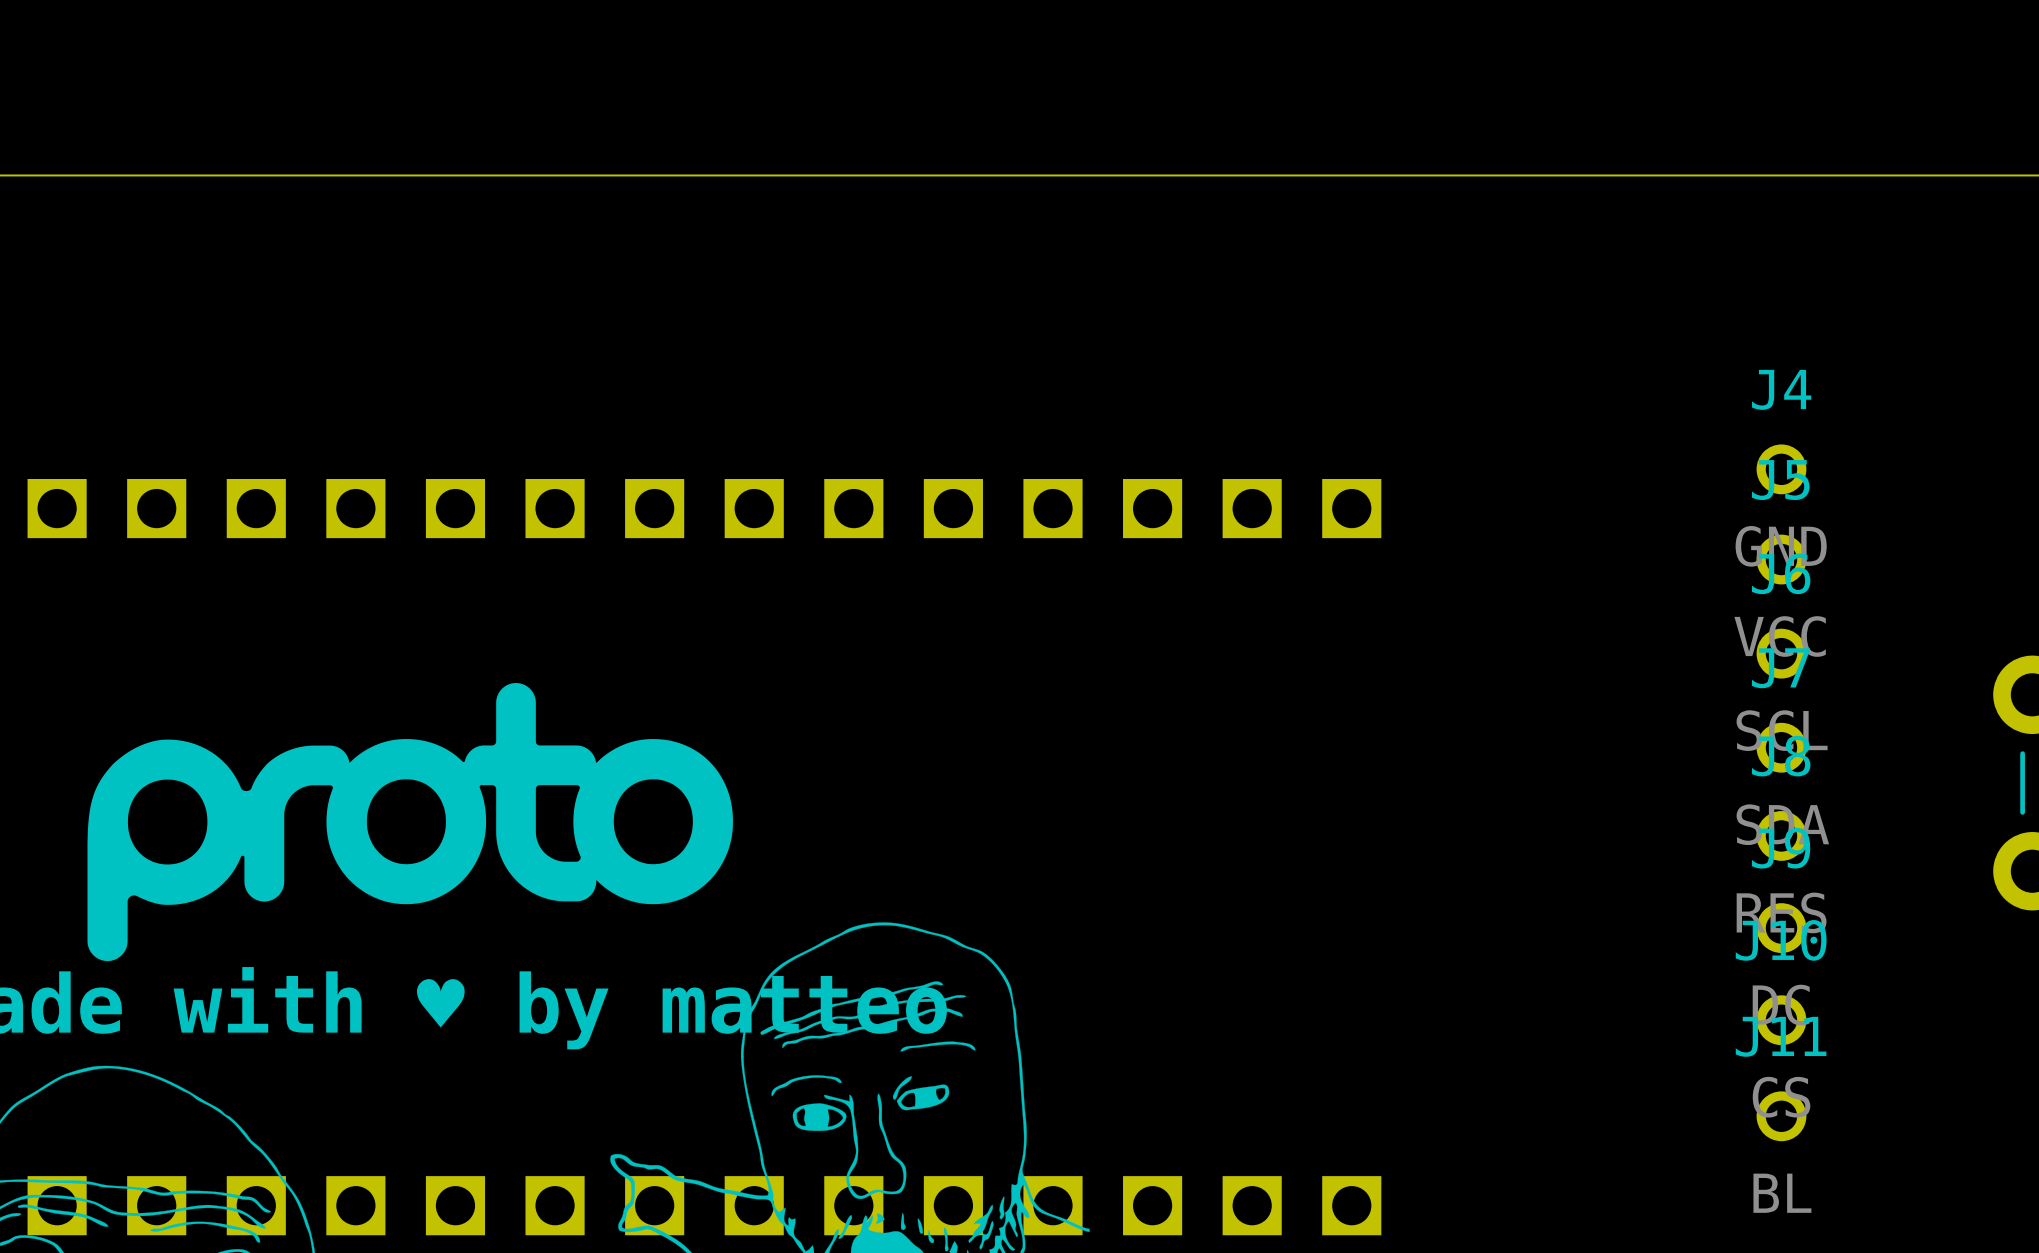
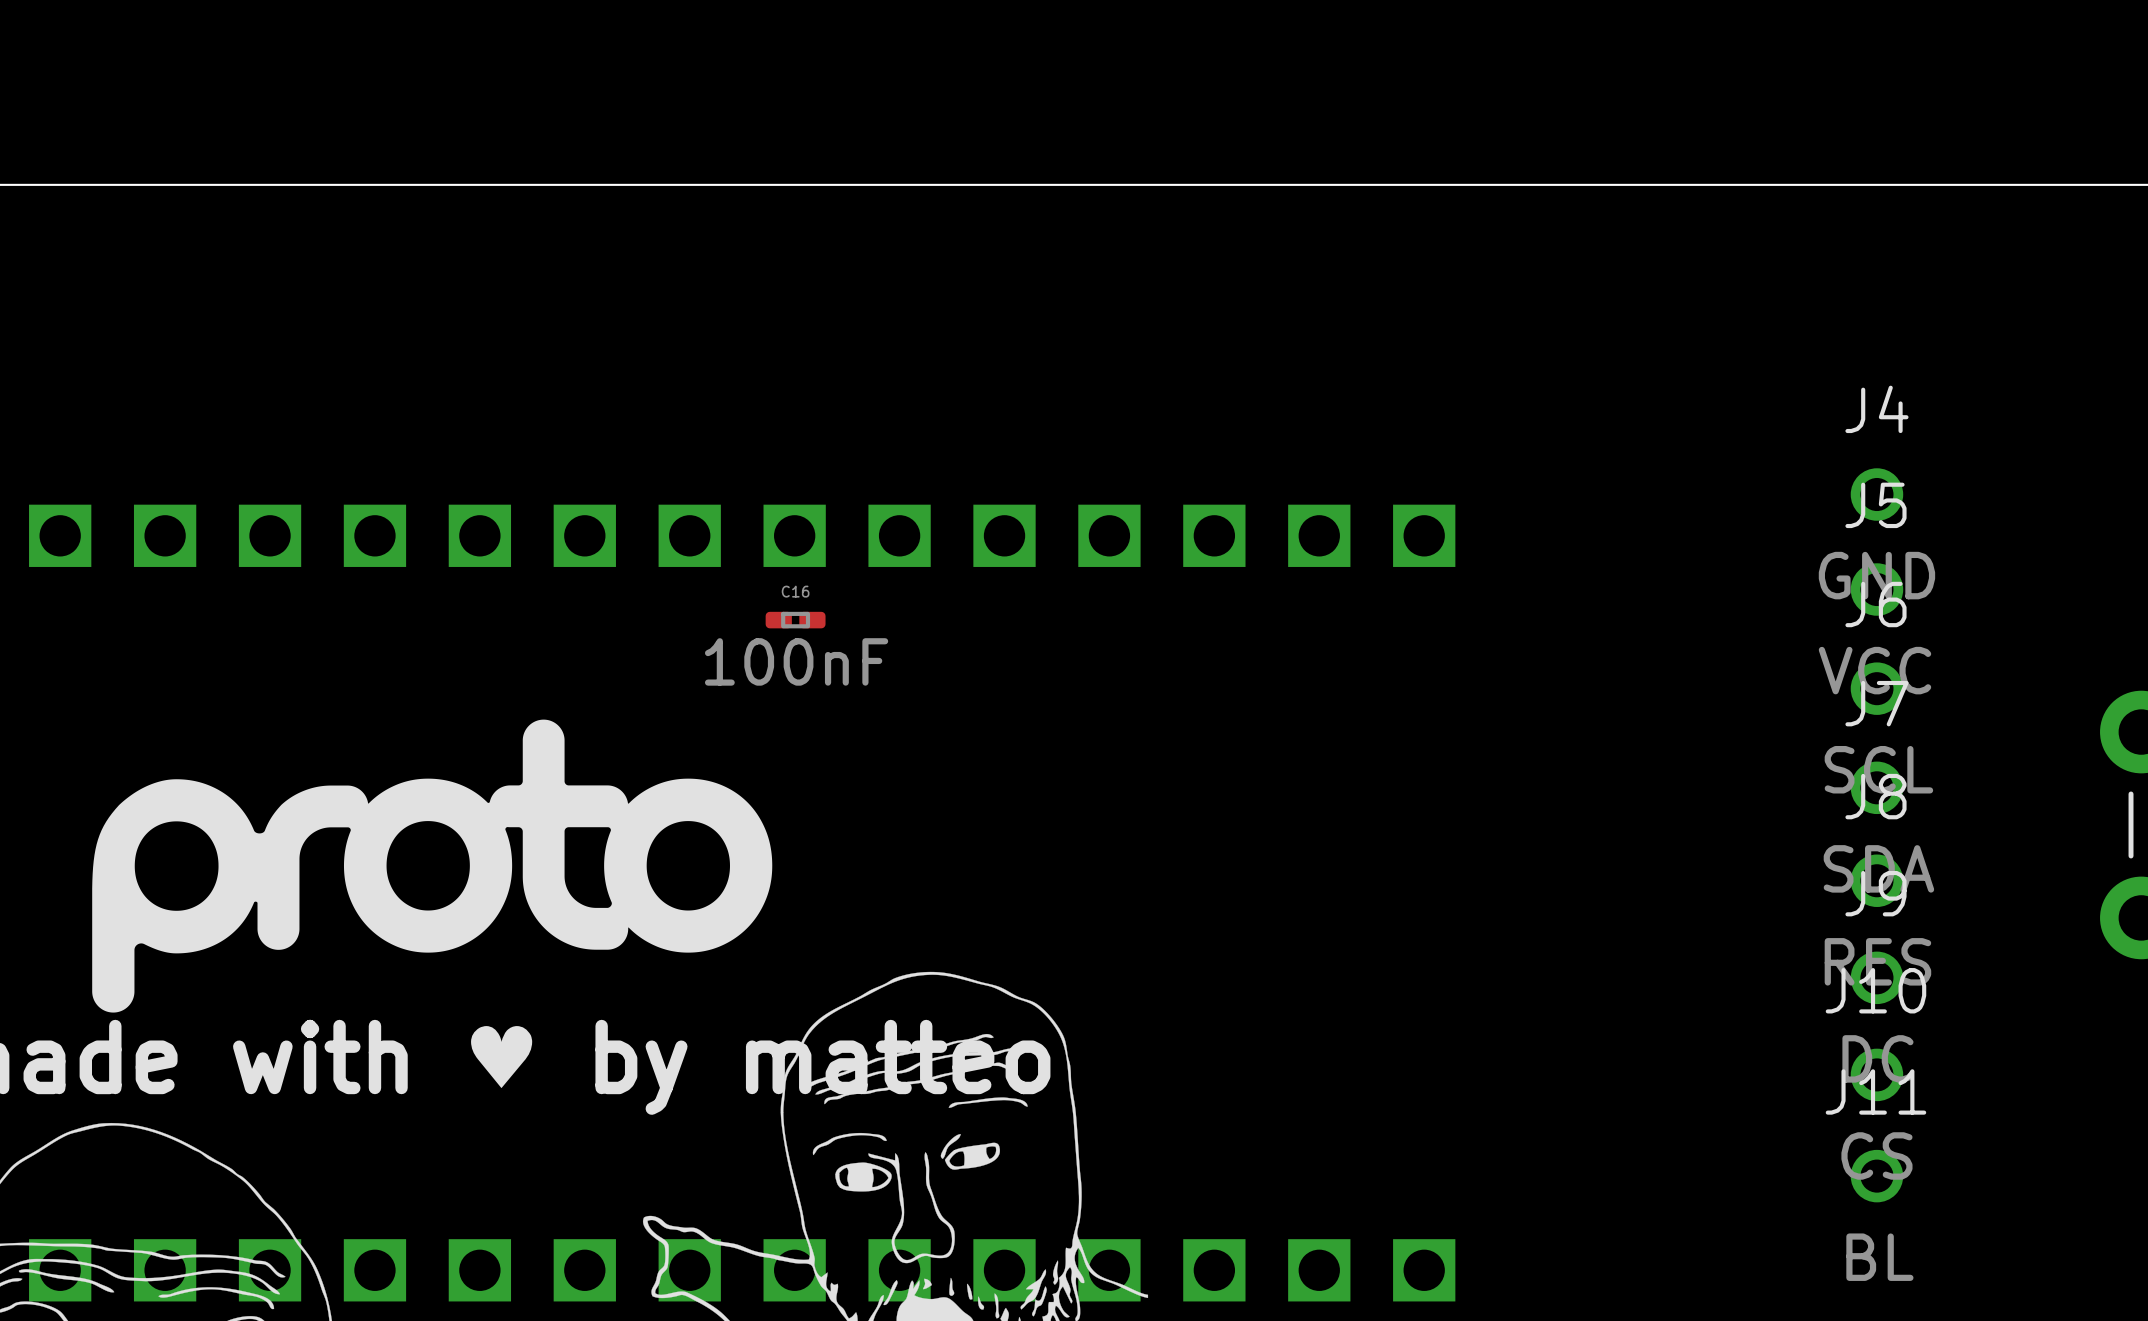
C16: none -> 100nF (795, 620)

